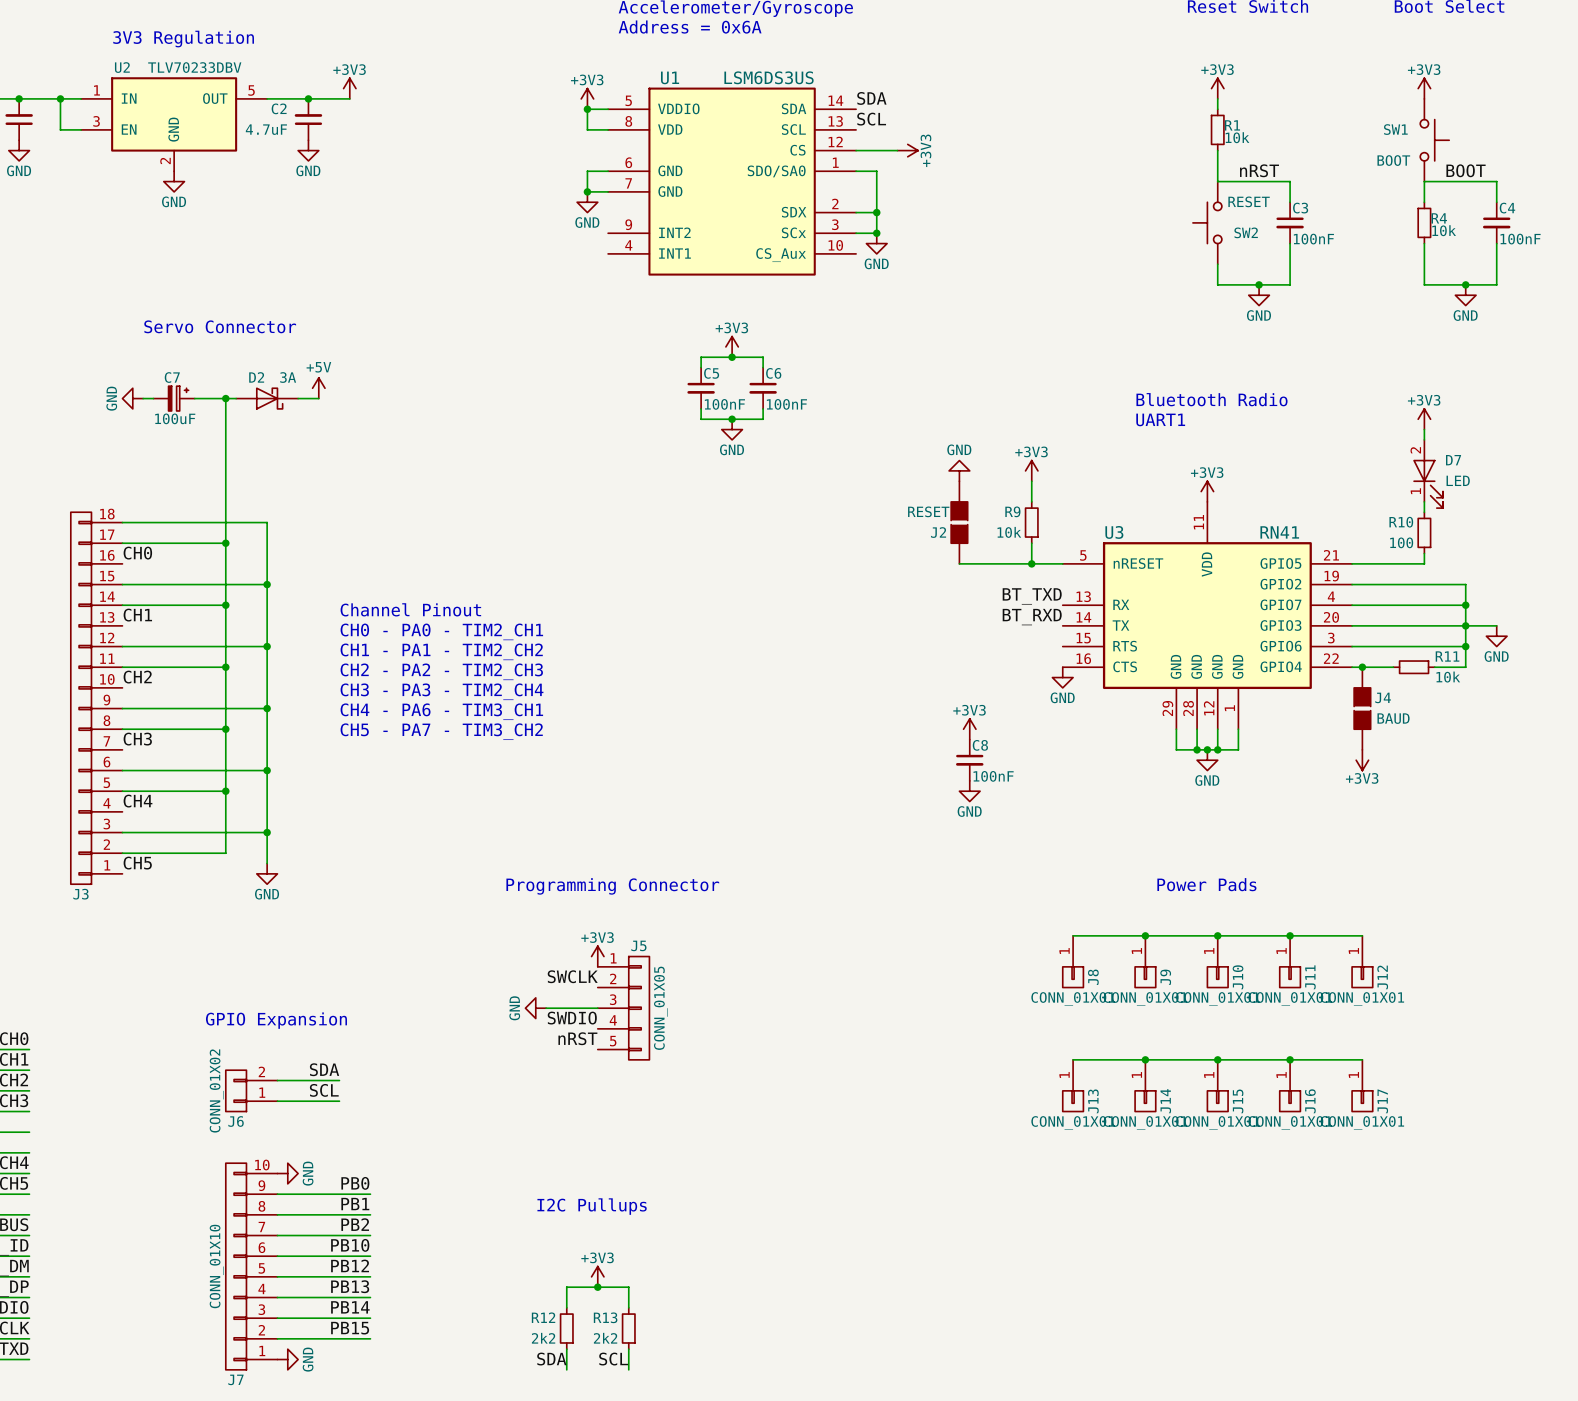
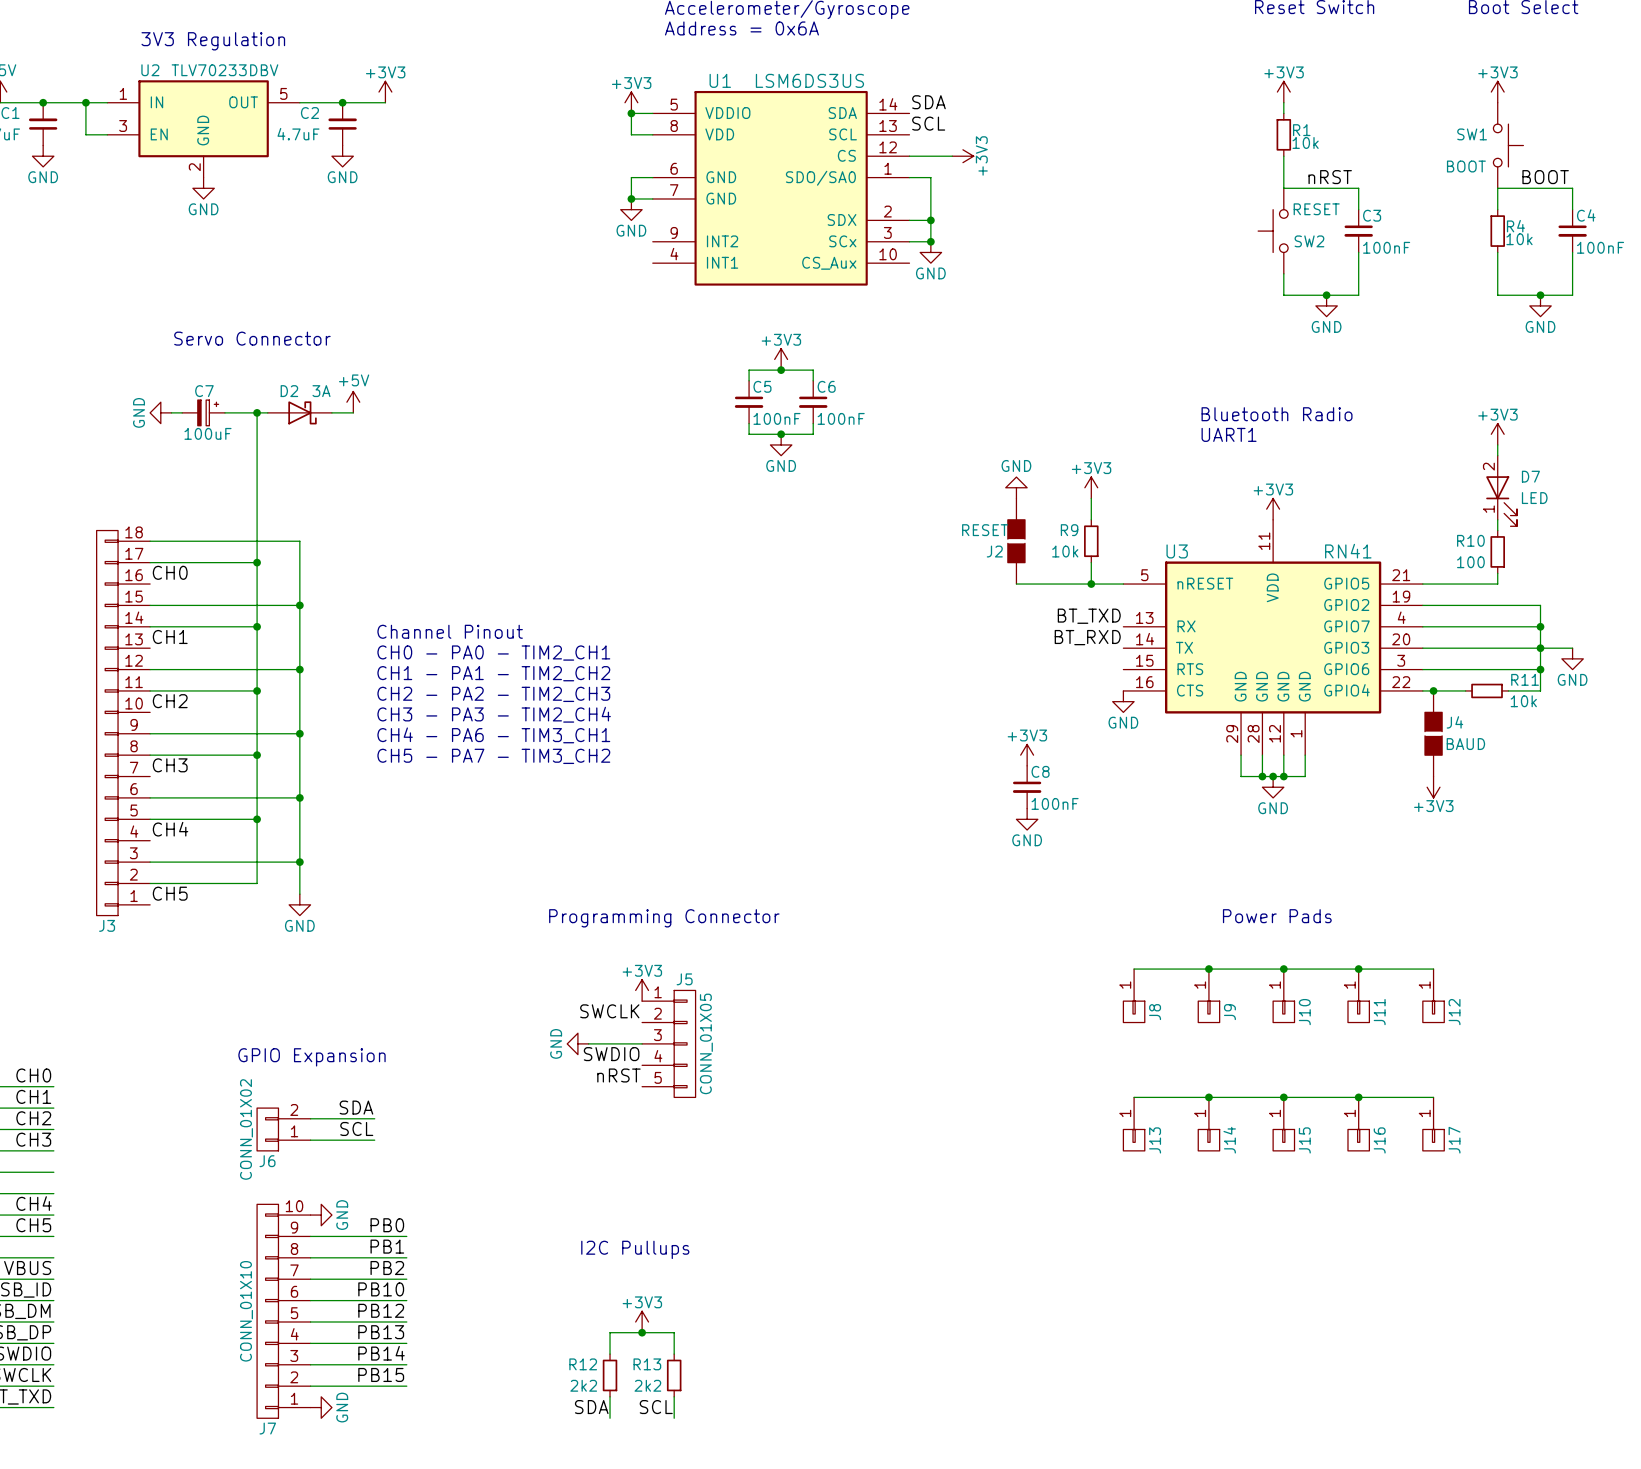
J8 value: CONN_01X01 (1073, 999) -> none
J9 value: CONN_01X01 (1145, 999) -> none
J10 value: CONN_01X01 (1217, 999) -> none
J11 value: CONN_01X01 (1290, 999) -> none
J12 value: CONN_01X01 (1362, 999) -> none
J13 value: CONN_01X01 (1073, 1123) -> none
J14 value: CONN_01X01 (1145, 1123) -> none
J15 value: CONN_01X01 (1217, 1123) -> none
J16 value: CONN_01X01 (1290, 1123) -> none
J17 value: CONN_01X01 (1362, 1123) -> none

